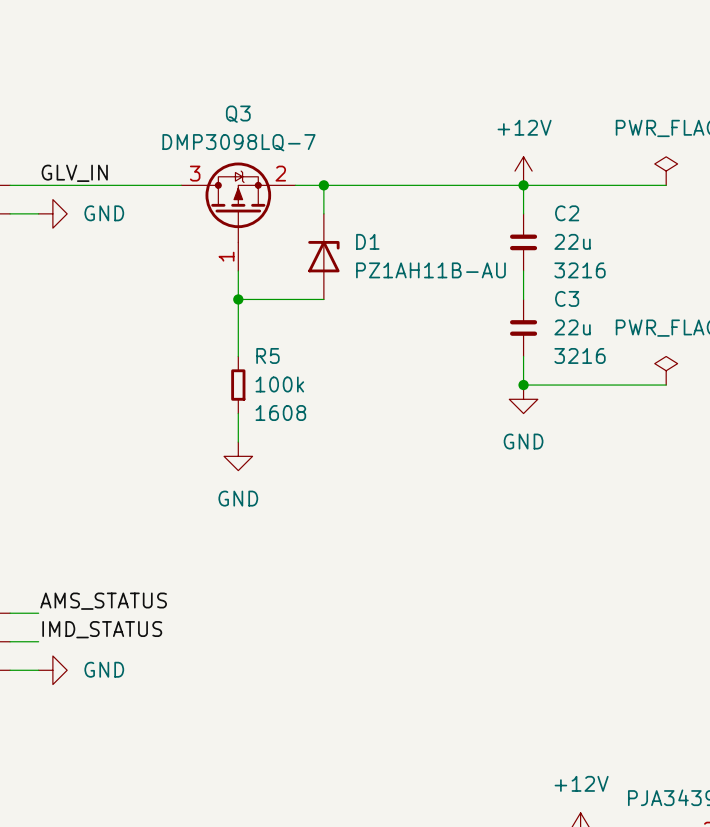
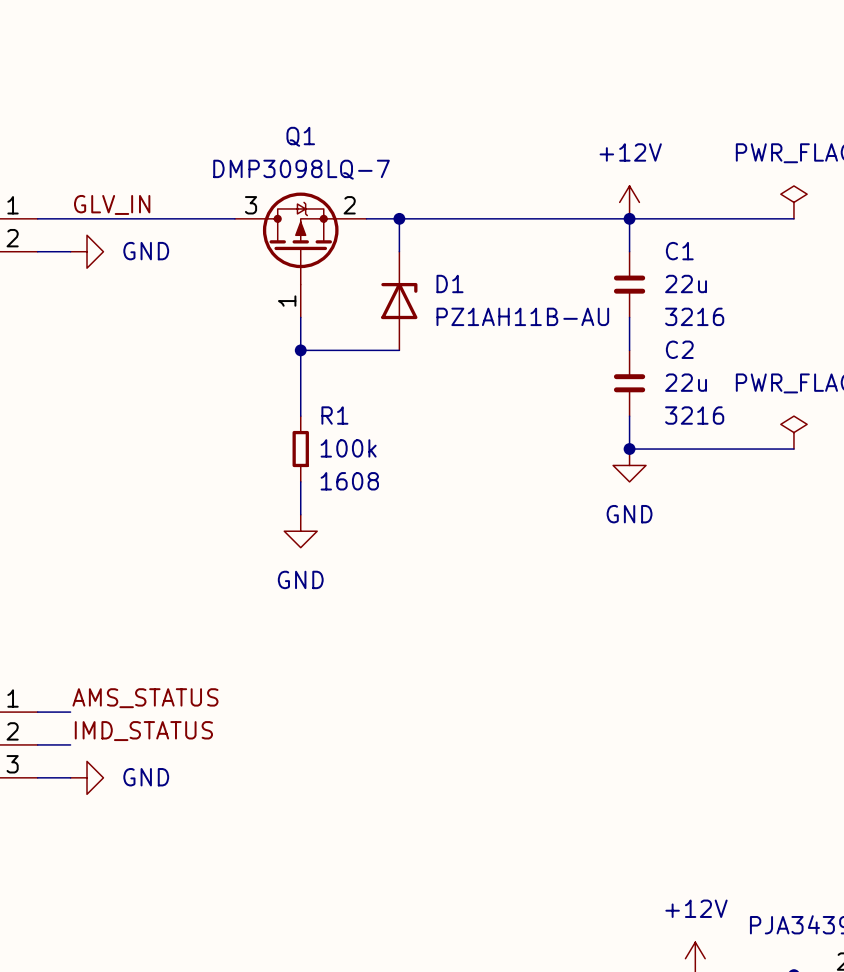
Q3 name: Q3 (238, 114) -> Q1 (300, 136)
C2 name: C2 (567, 213) -> C1 (679, 251)
C3 name: C3 (567, 298) -> C2 (679, 349)
R5 name: R5 (267, 355) -> R1 (334, 415)

